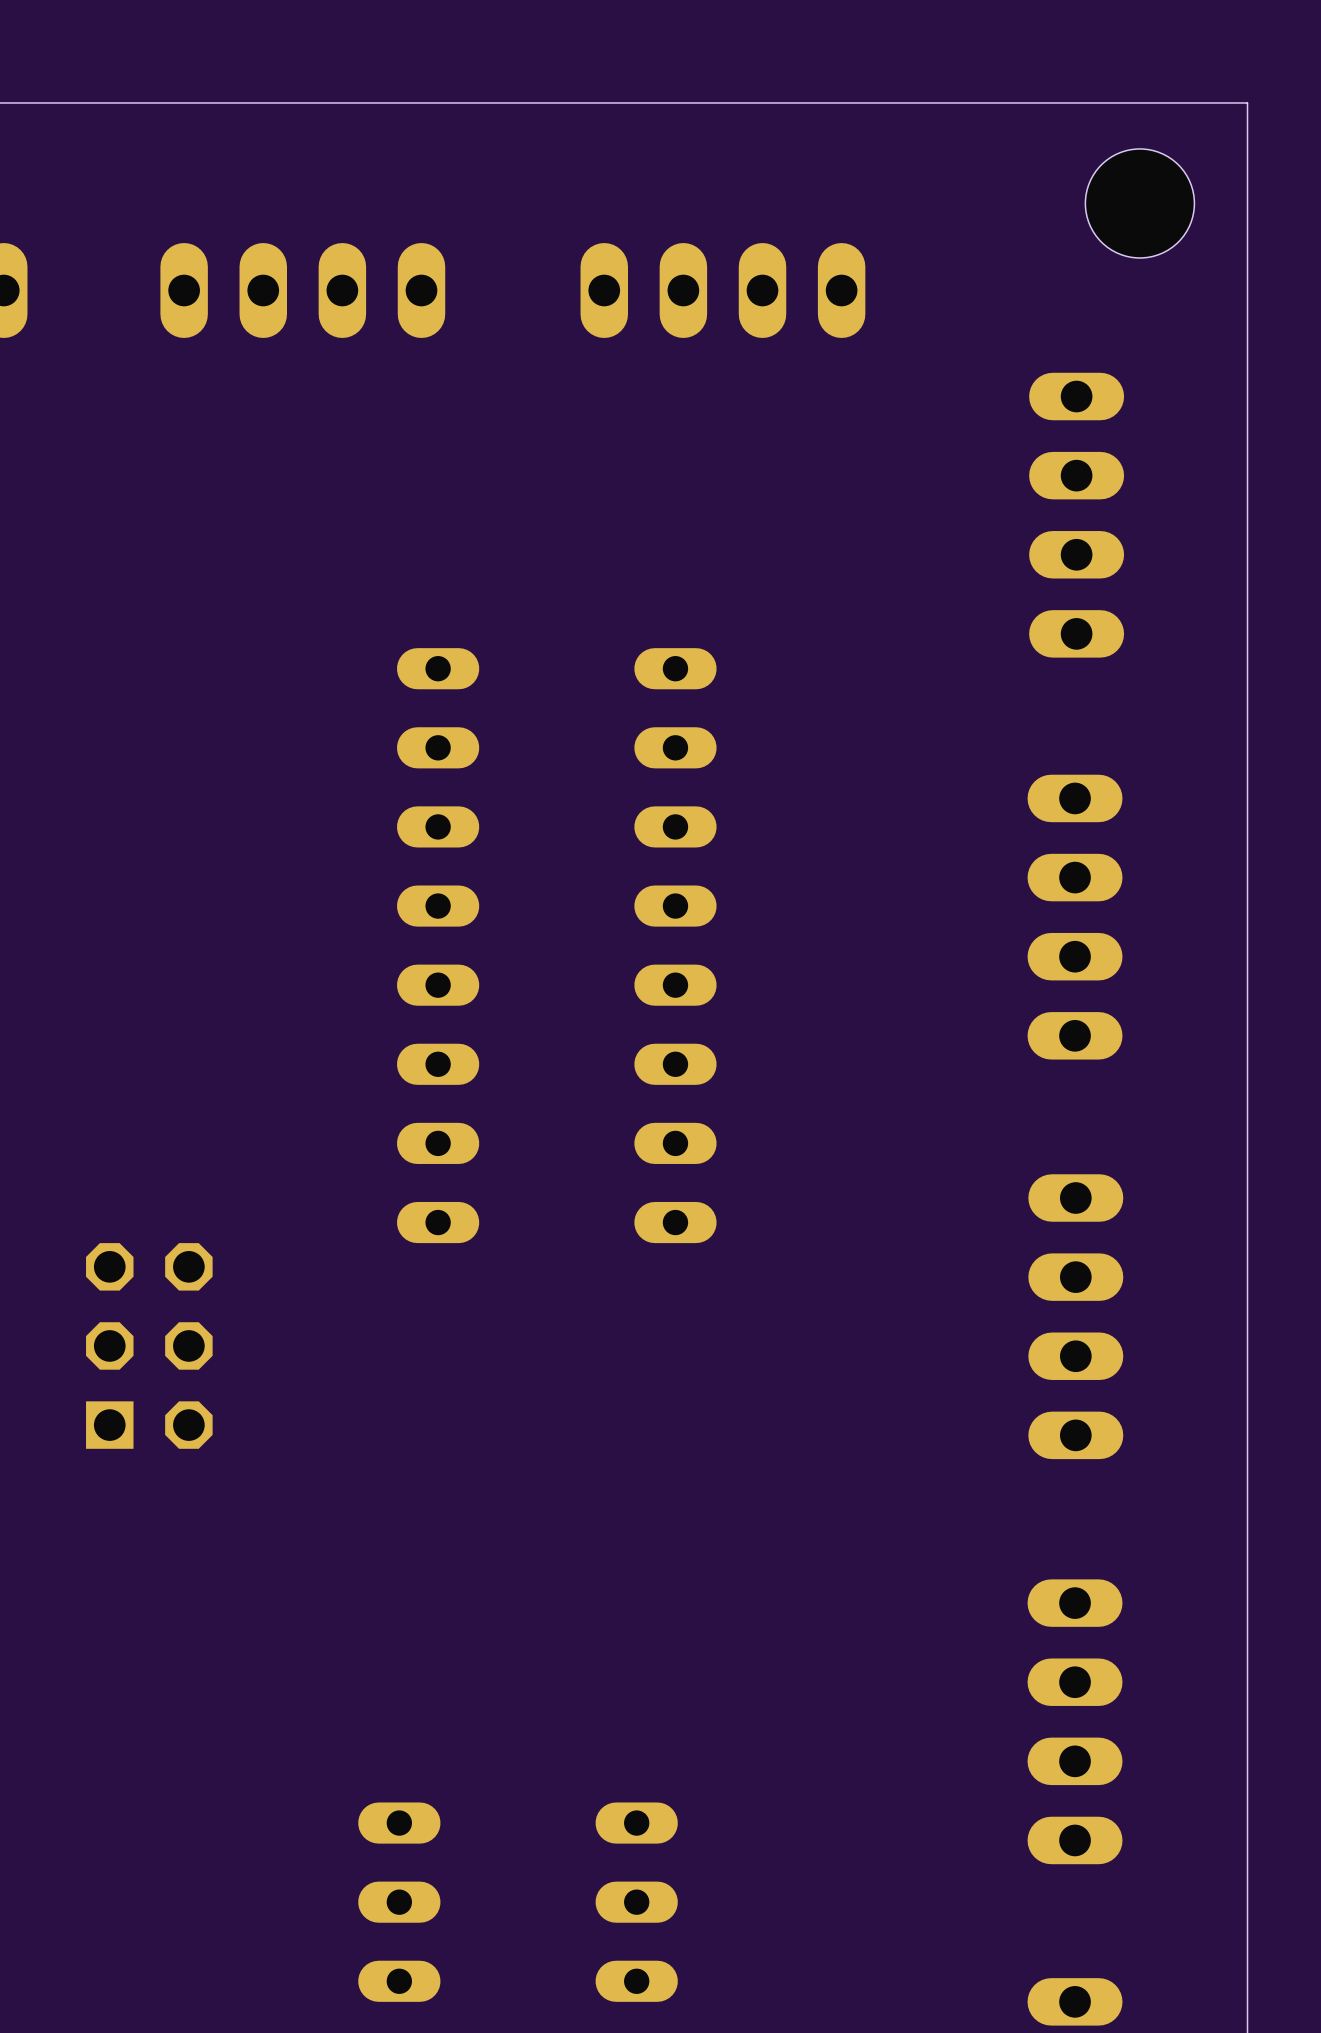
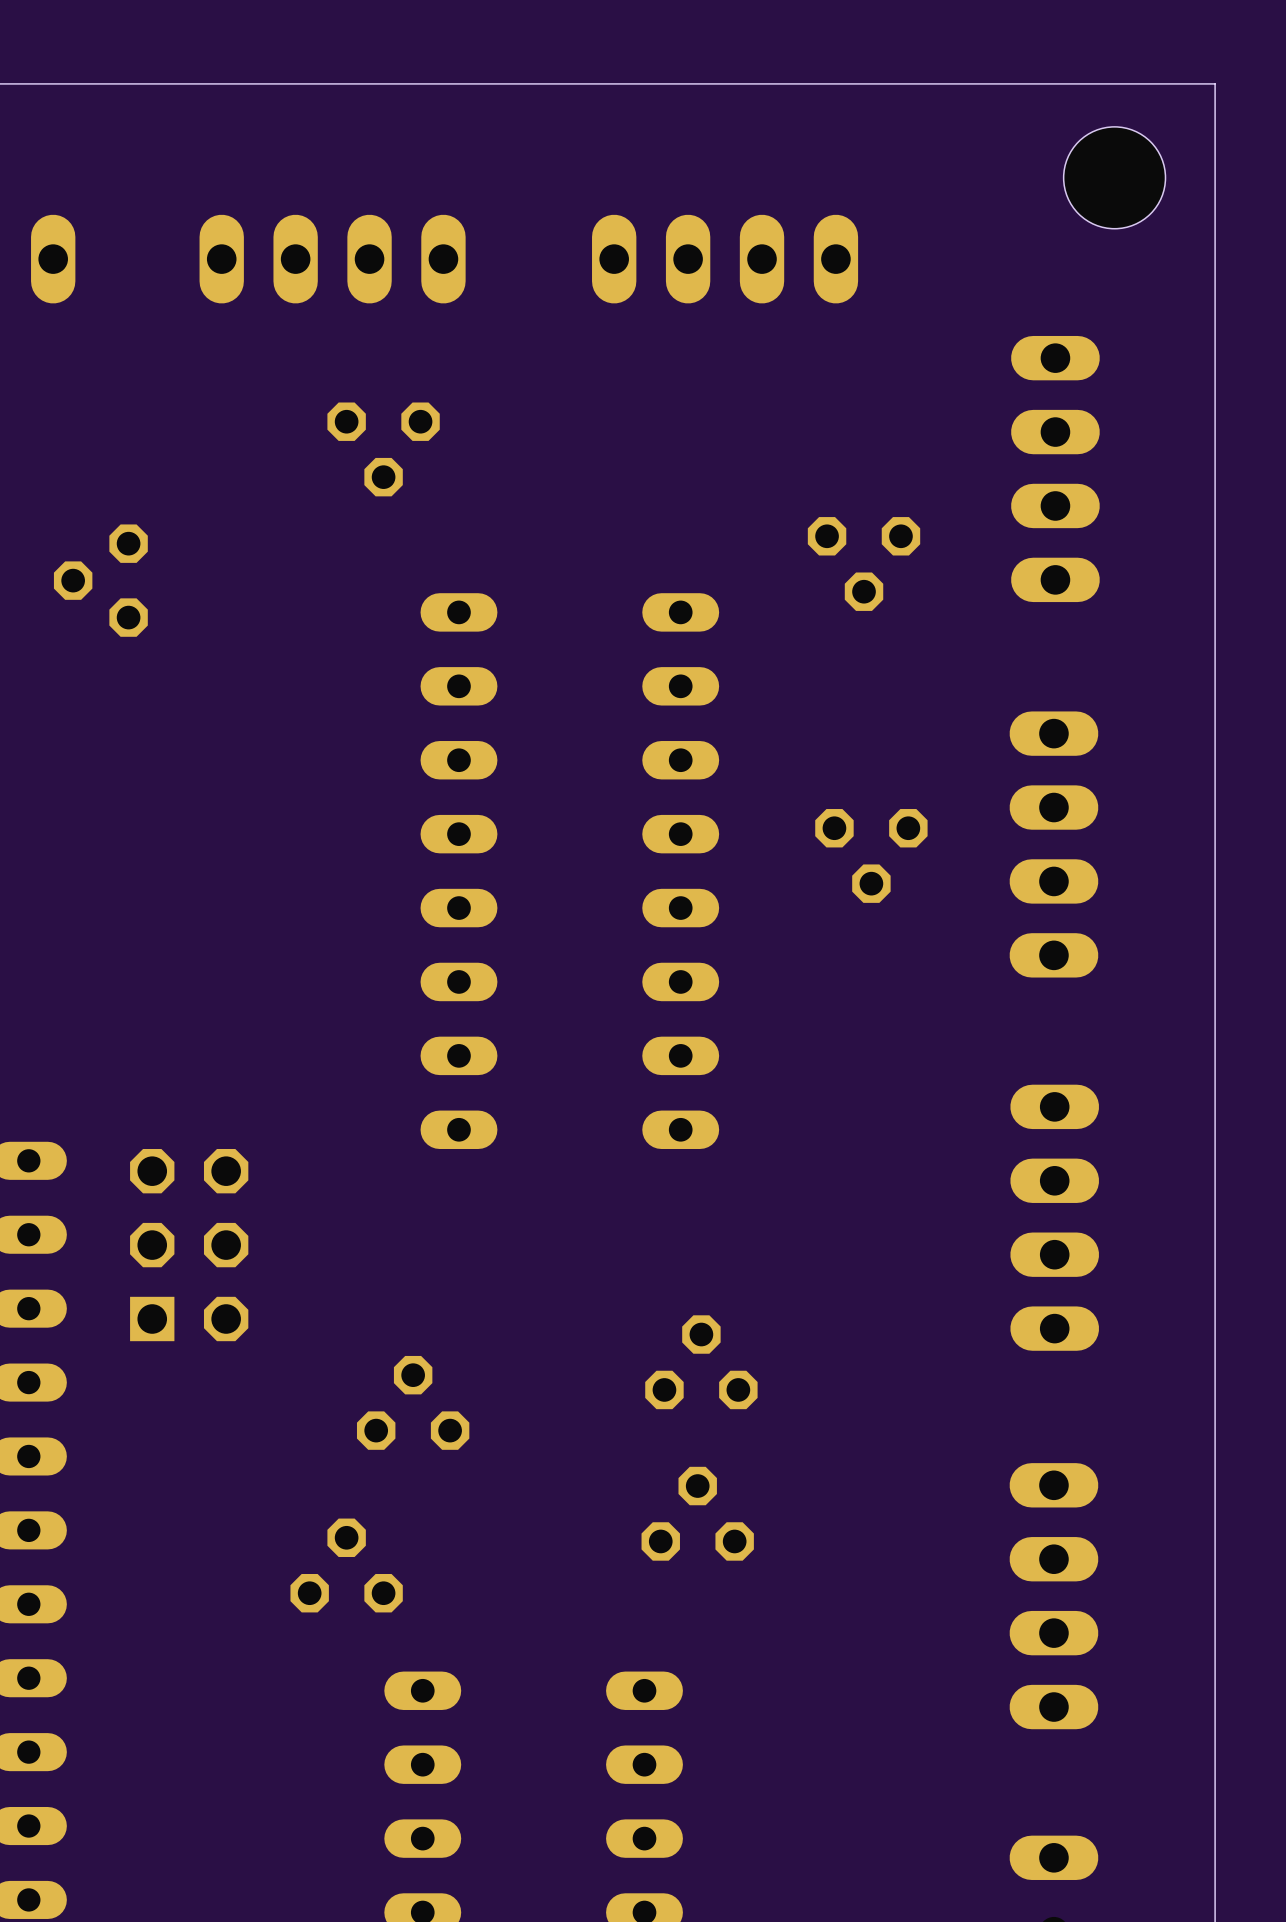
part: none -> (383, 449)
part: none -> (864, 563)
part: none -> (100, 580)
part: none -> (871, 855)
part: none -> (701, 1362)
part: none -> (413, 1402)
part: none -> (697, 1513)
part: none -> (346, 1565)

